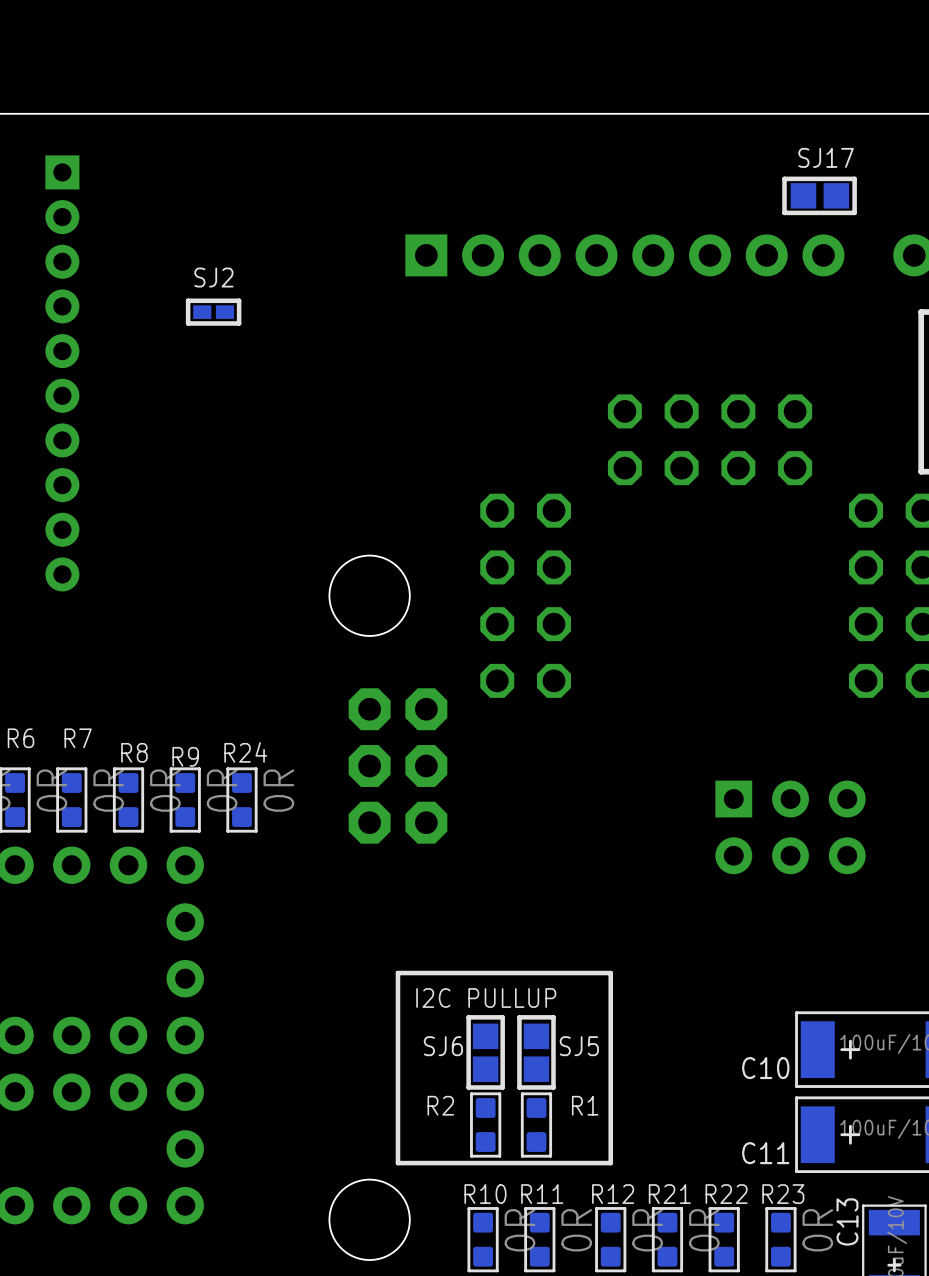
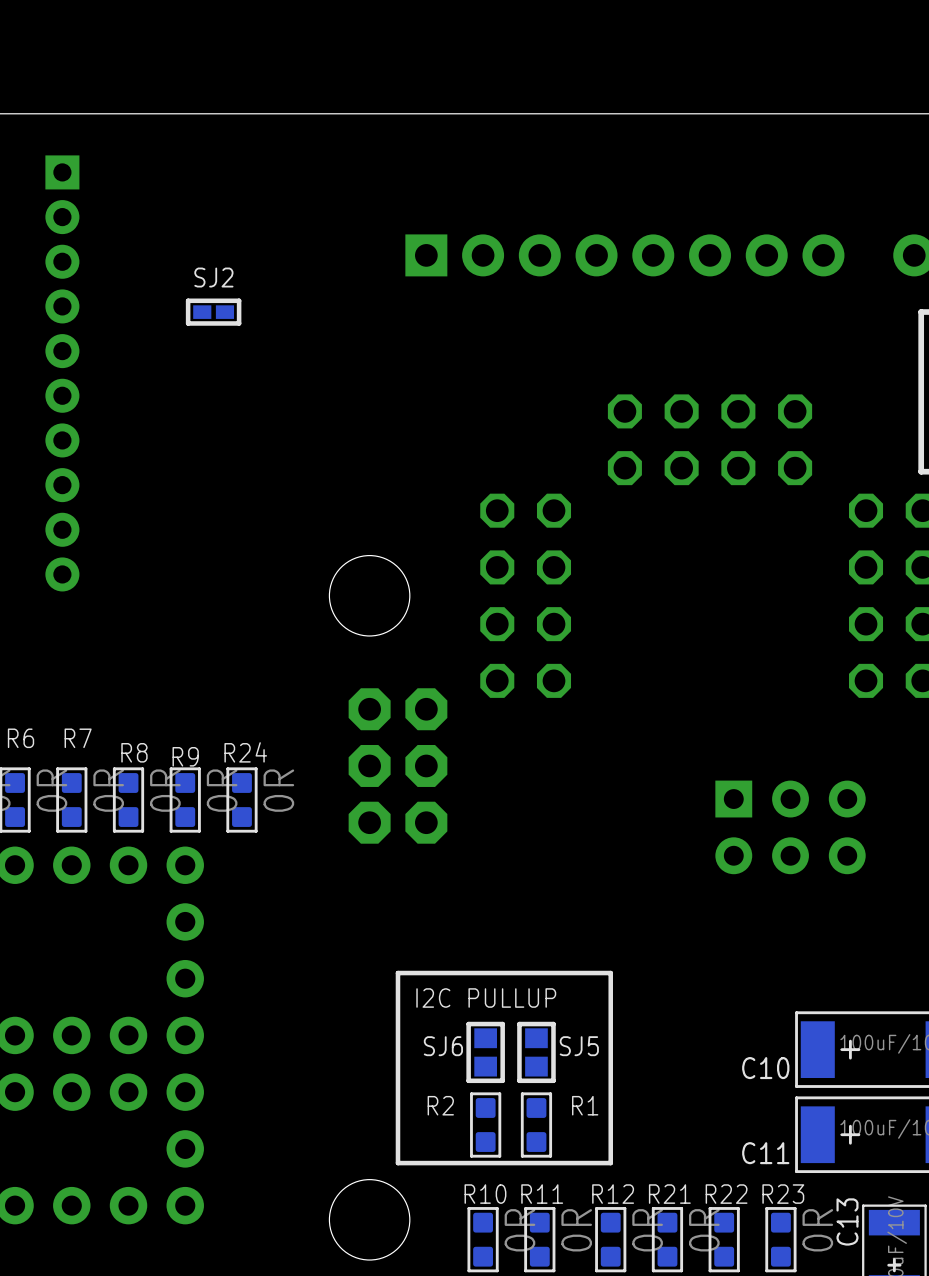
SJ17: (819, 195) -> none
SJ6 footprint: [466, 1015, 505, 1090] -> [466, 1021, 505, 1084]
SJ5 footprint: [517, 1015, 556, 1090] -> [517, 1021, 556, 1084]

